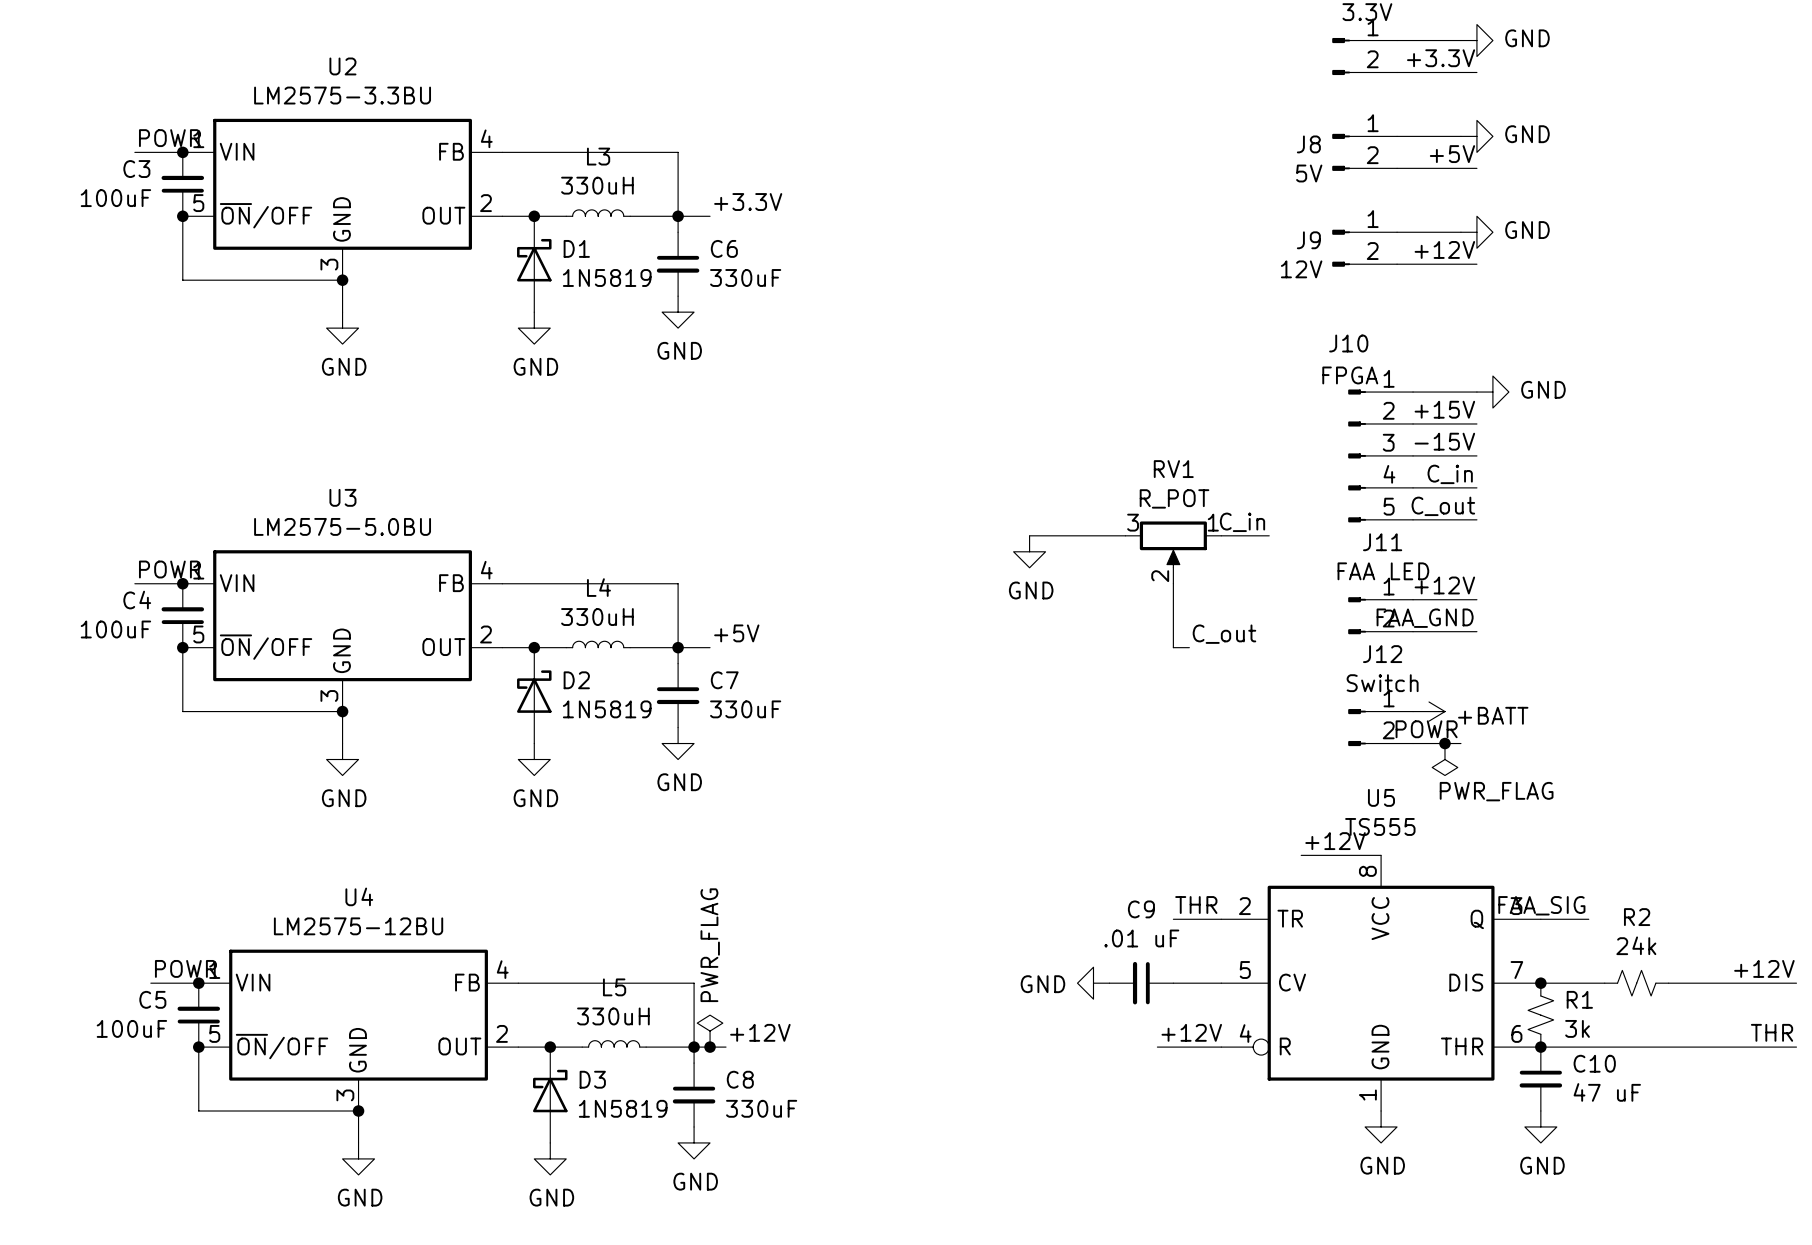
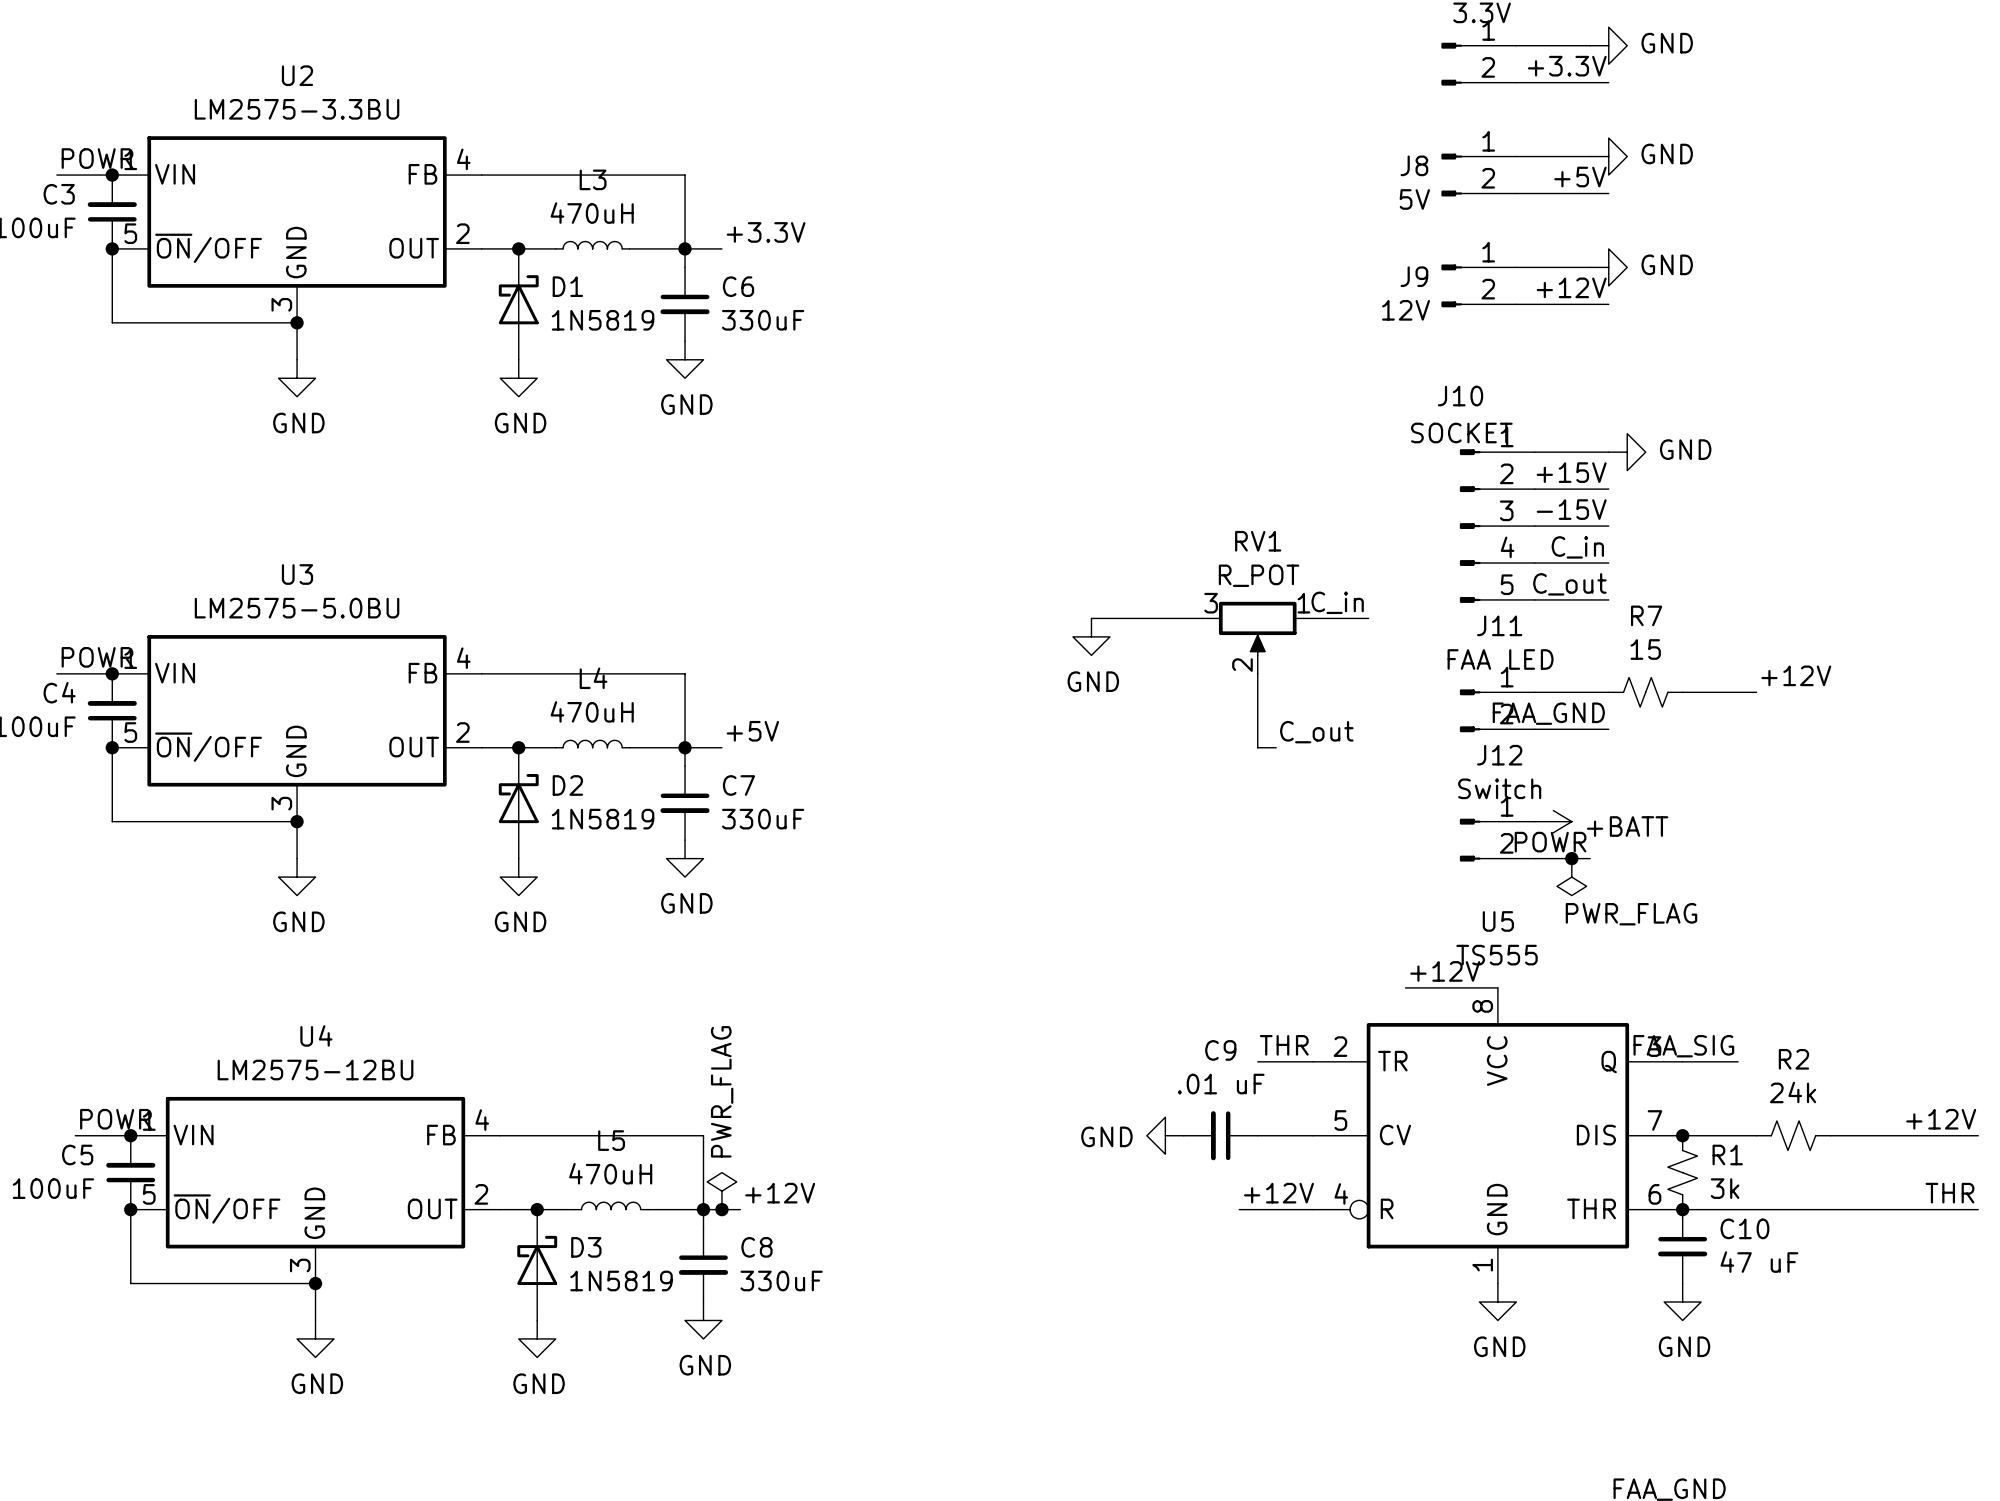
L3 value: 330uH (597, 185) -> 470uH (592, 213)
J10 value: FPGA (1350, 375) -> SOCKET (1461, 432)
label position: +12V (1444, 585) -> +12V (1796, 675)
R7: none -> 15 (1645, 692)
wire: none -> (1682, 692) (1756, 692)
L4 value: 330uH (597, 617) -> 470uH (592, 711)
L5 value: 330uH (613, 1016) -> 470uH (610, 1173)

